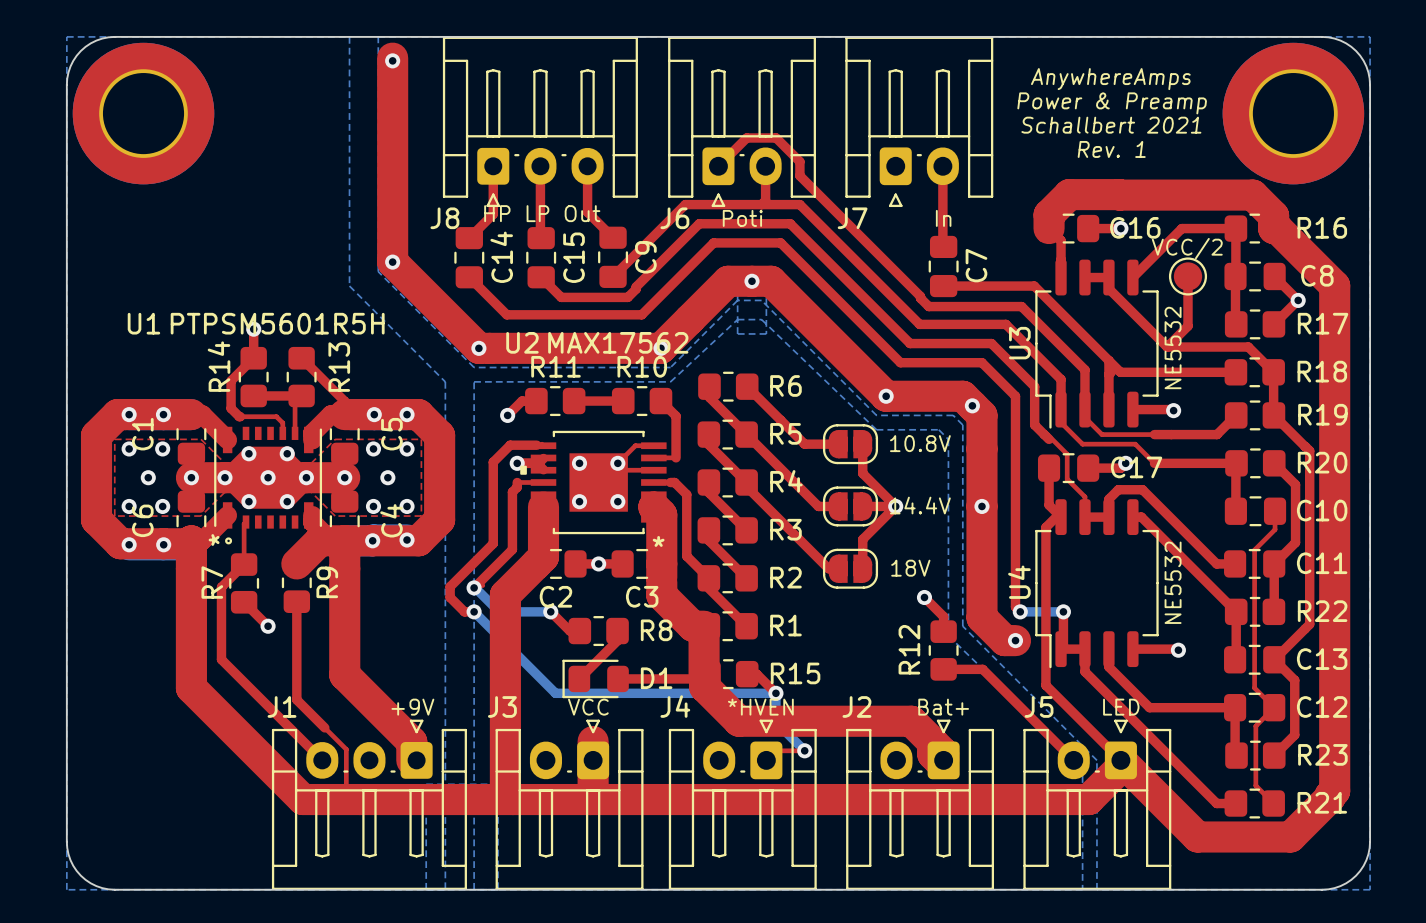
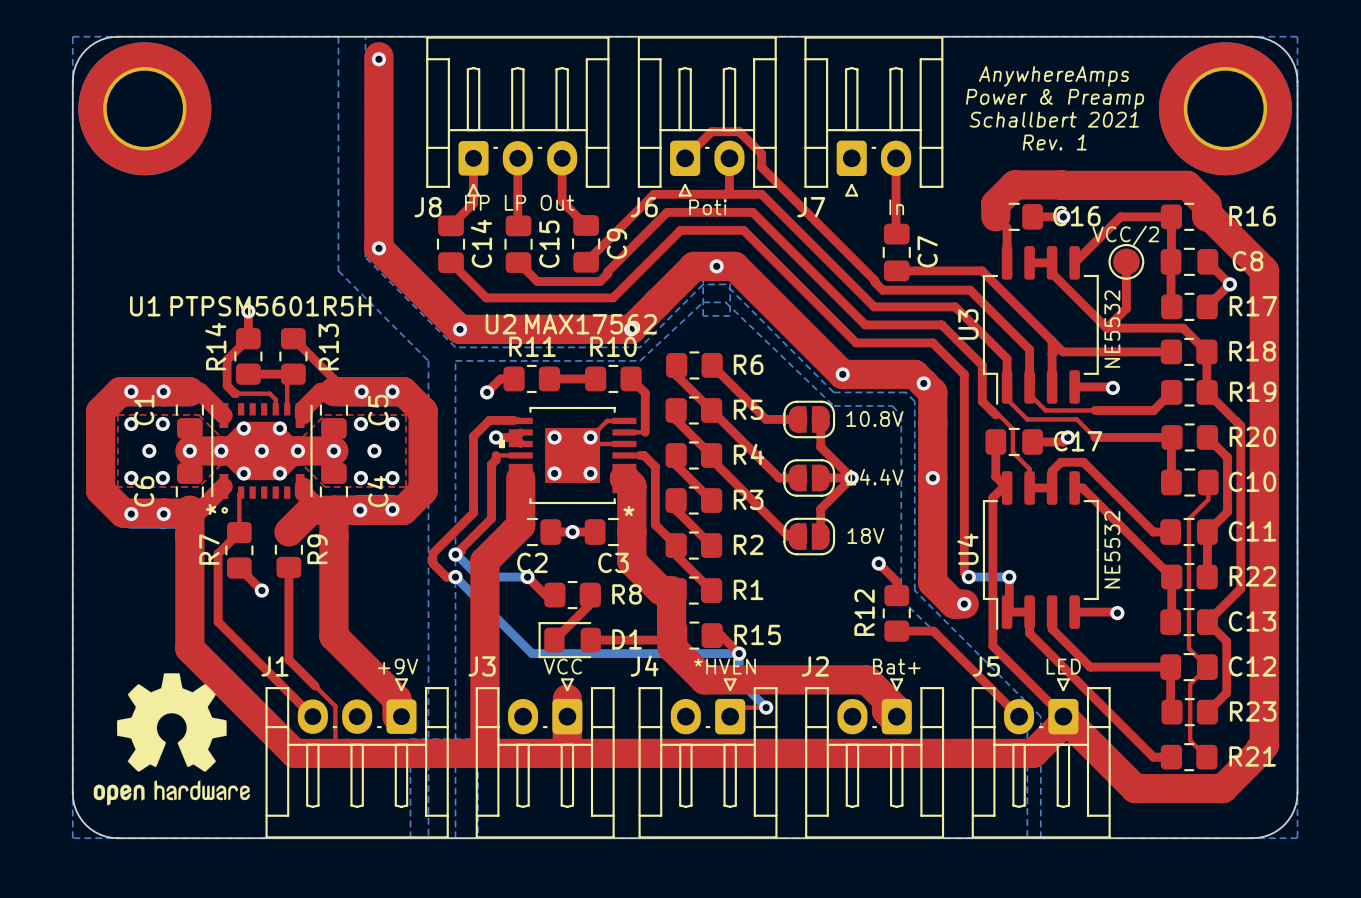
drawing: none -> [93, 673, 250, 806]

